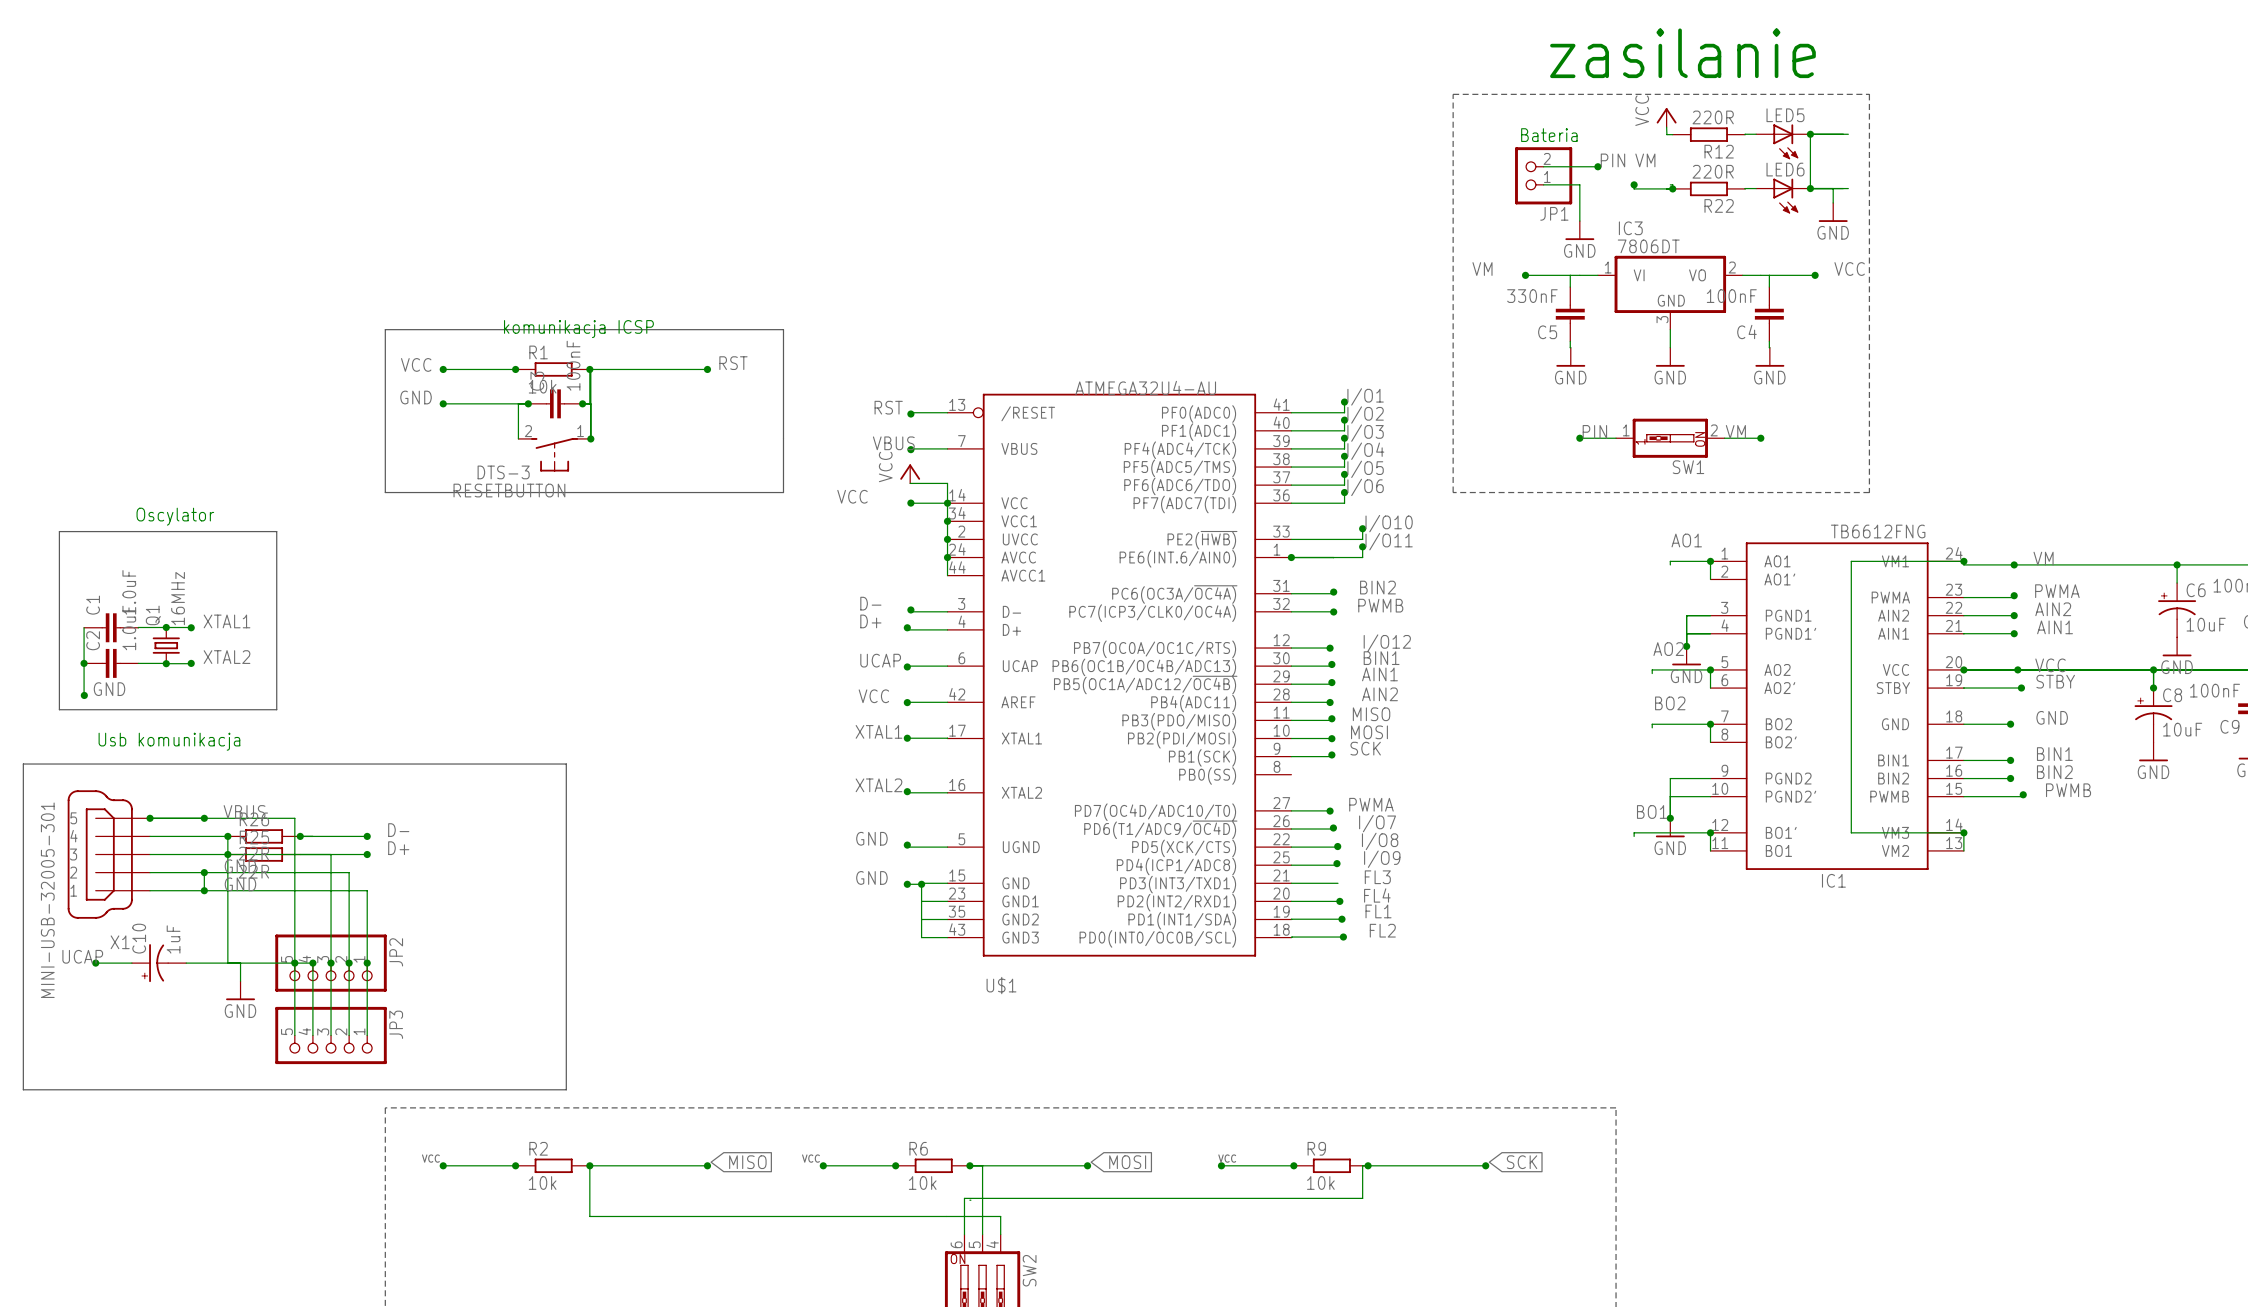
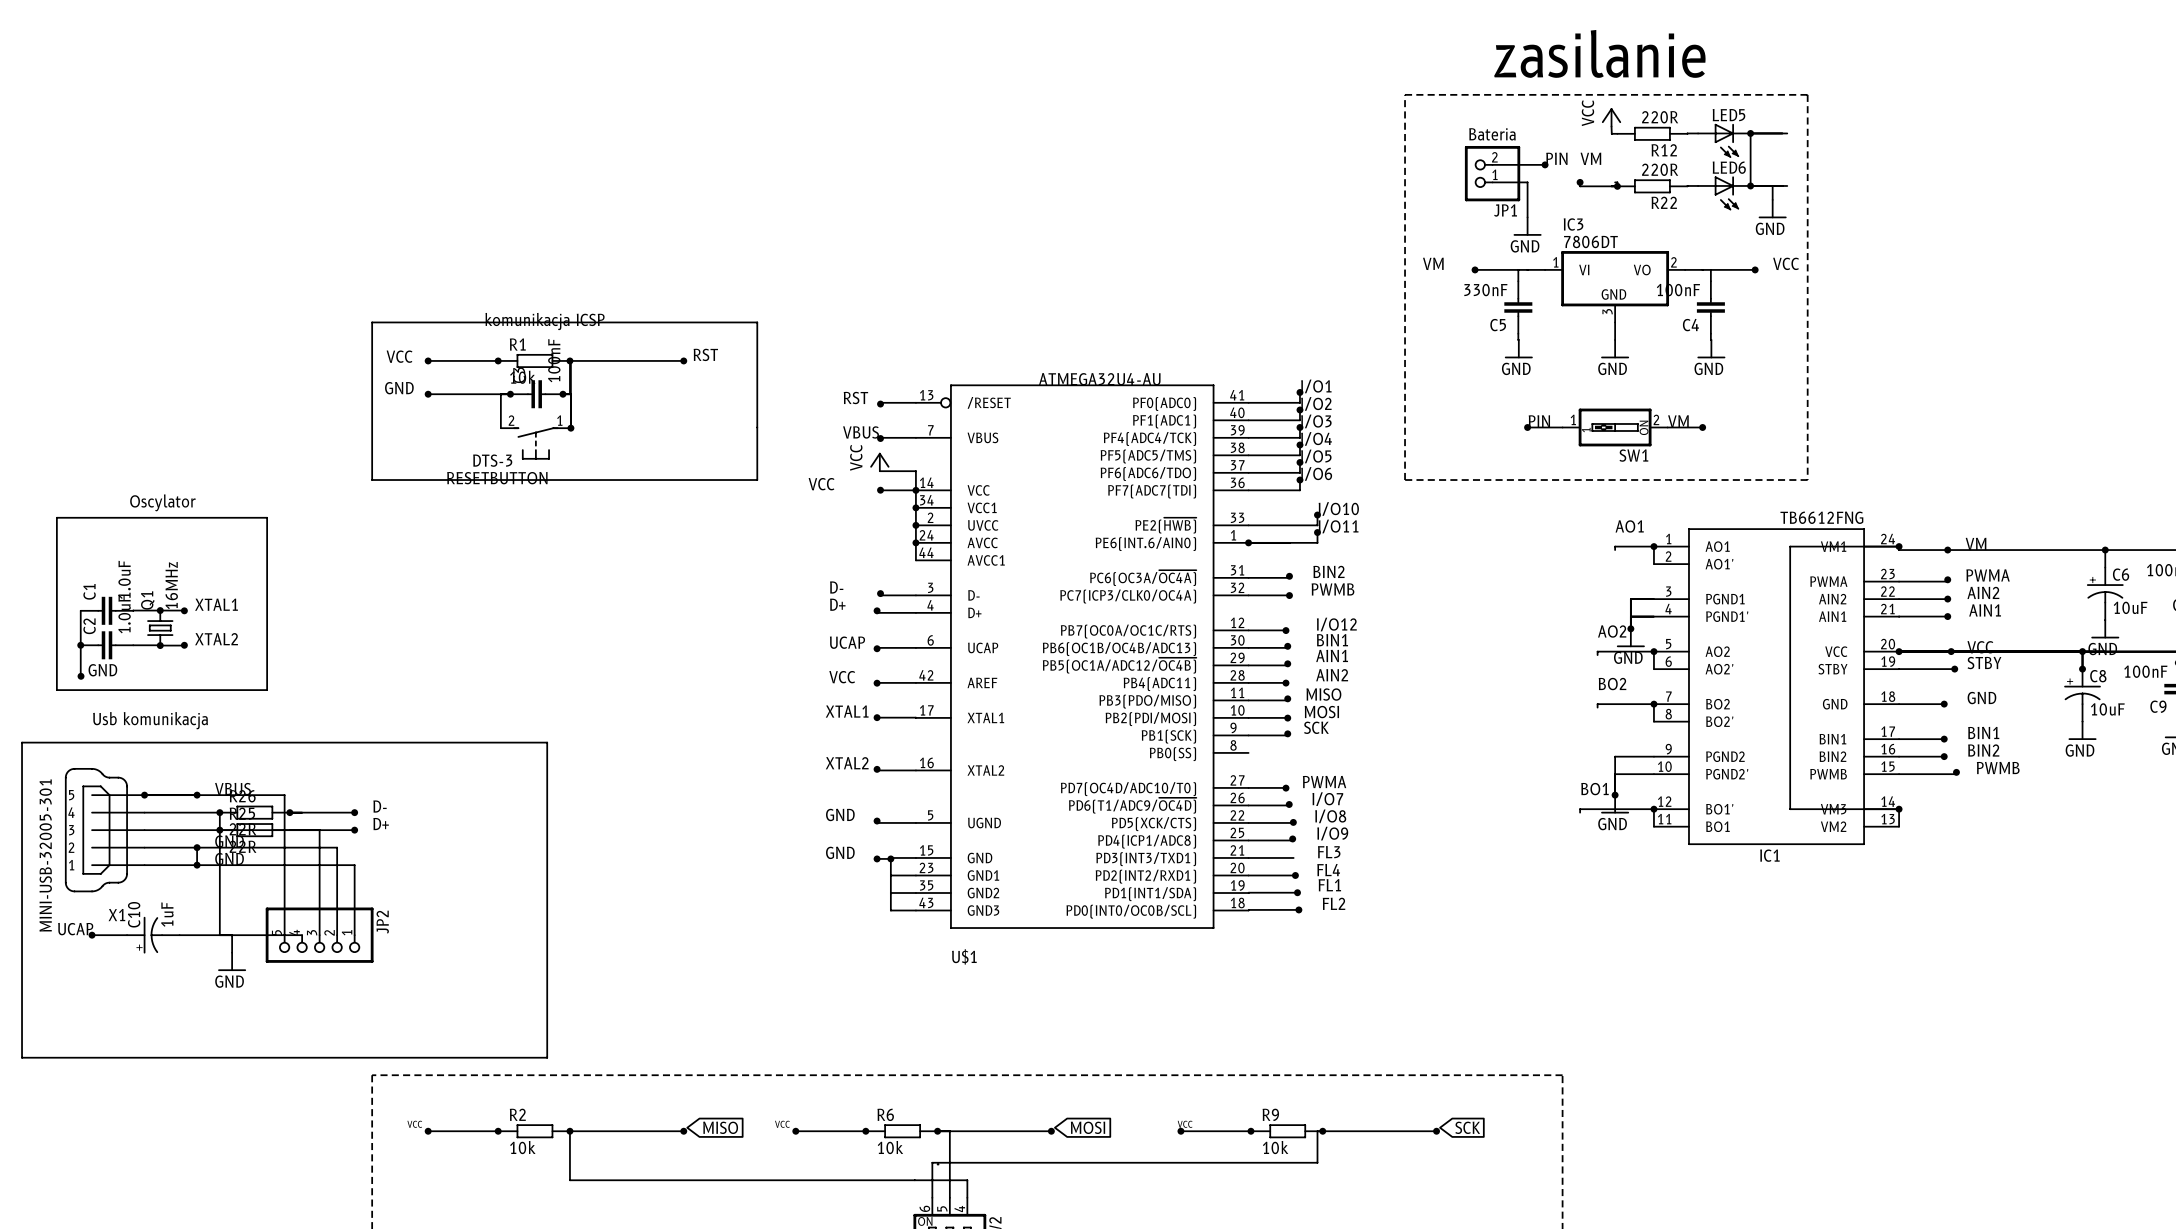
wire: (294, 963) (294, 1035) -> none
junction: (294, 963) -> none
wire: (312, 963) (312, 1035) -> none
junction: (312, 963) -> none
wire: (331, 963) (331, 1035) -> none
junction: (331, 963) -> none
wire: (349, 963) (349, 1035) -> none
junction: (349, 963) -> none
wire: (367, 963) (367, 1035) -> none
junction: (367, 963) -> none
JP3: (331, 1035) -> none

